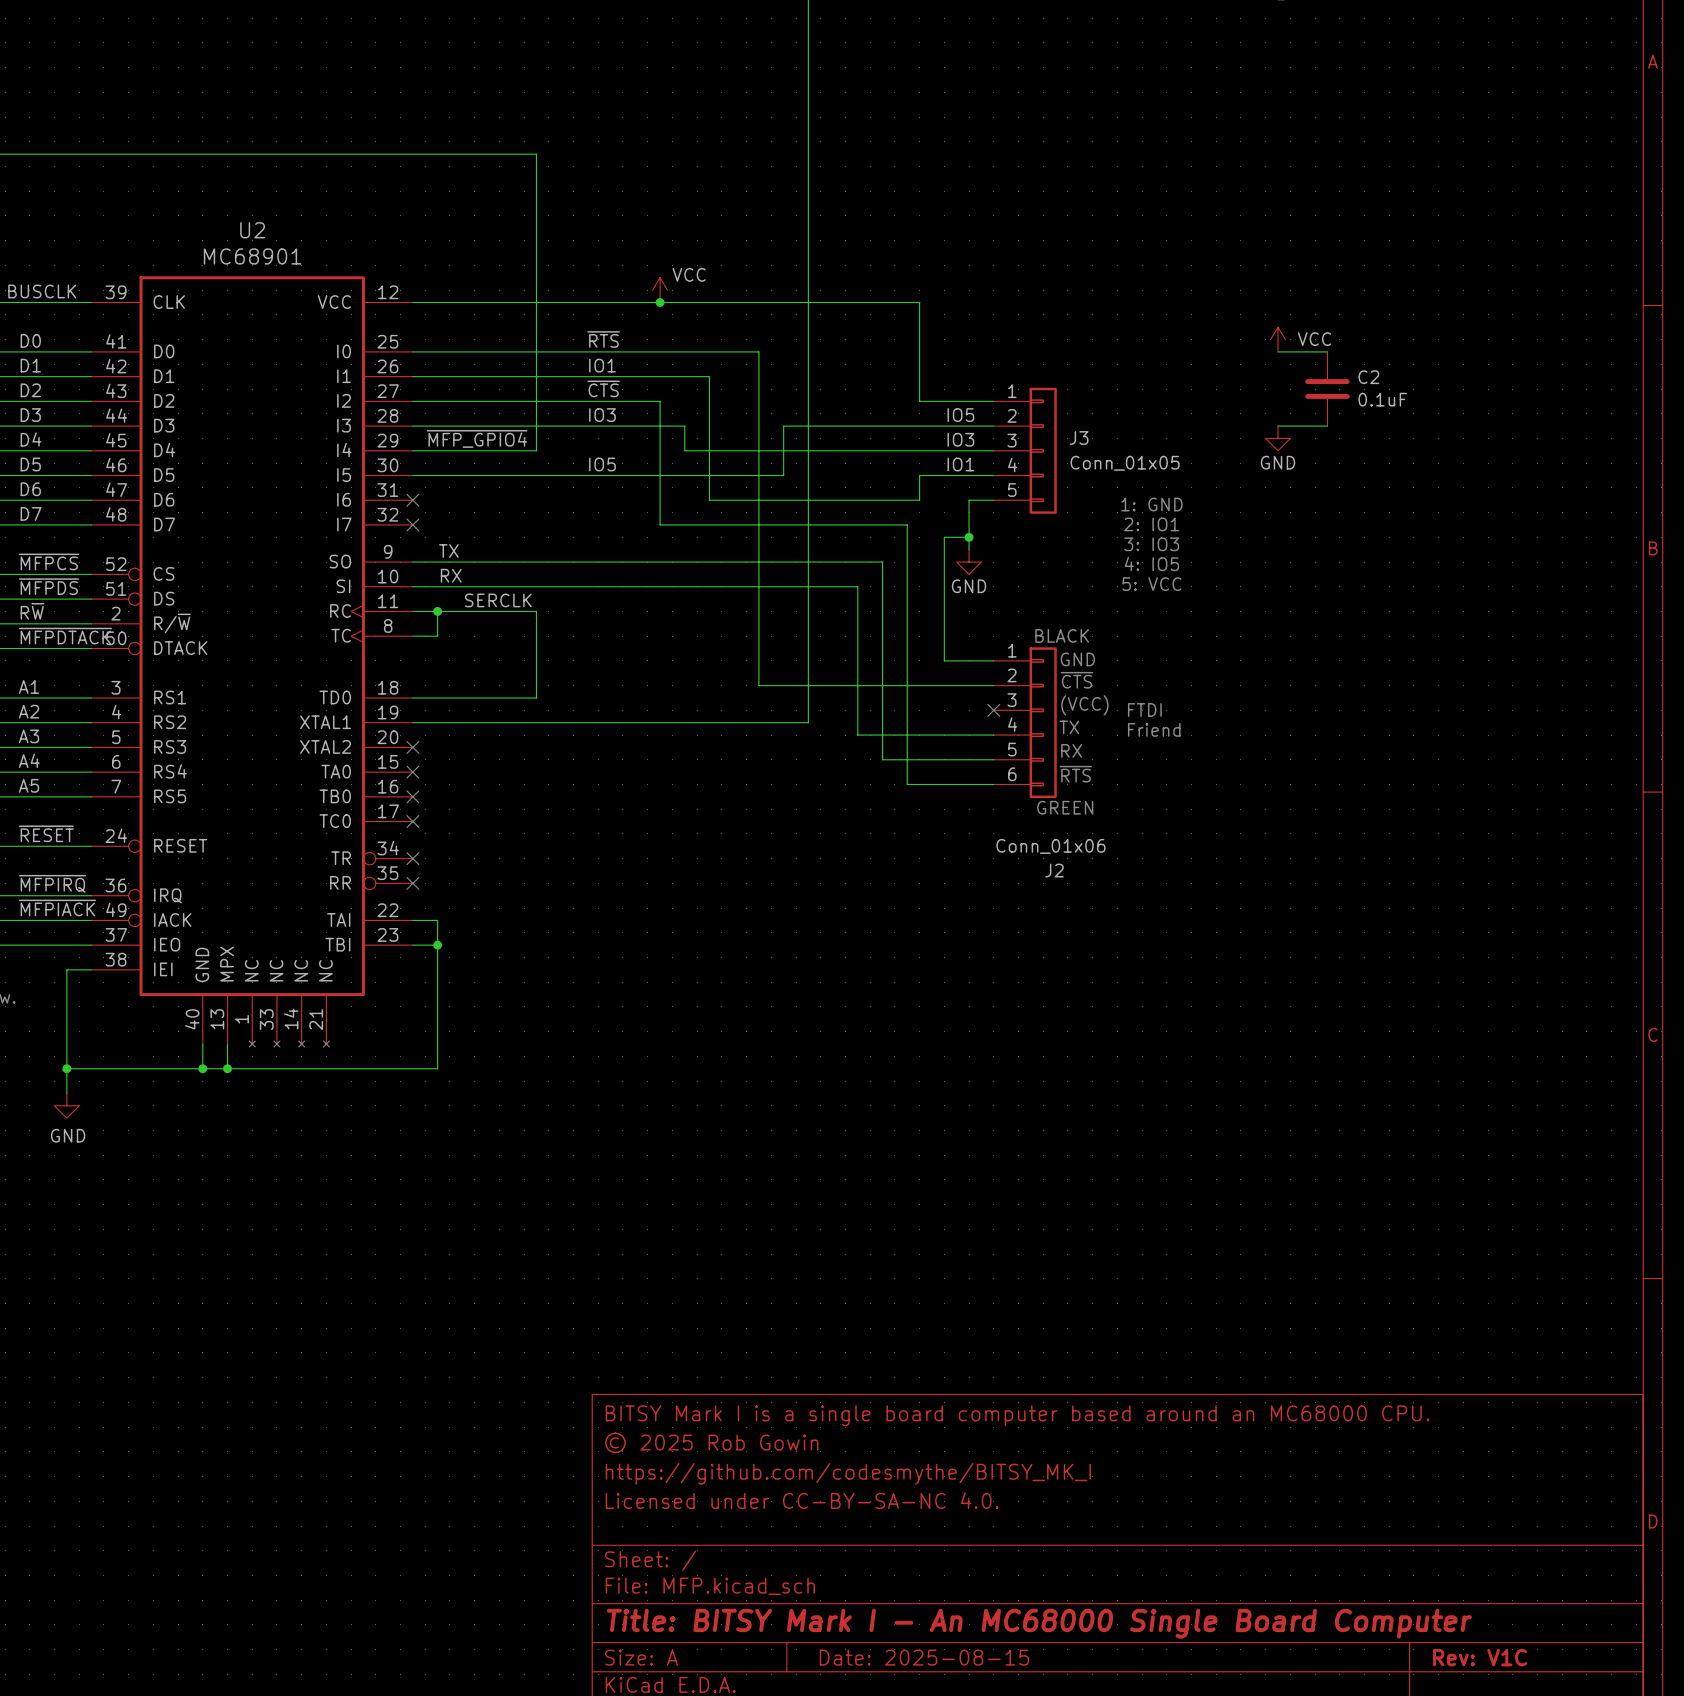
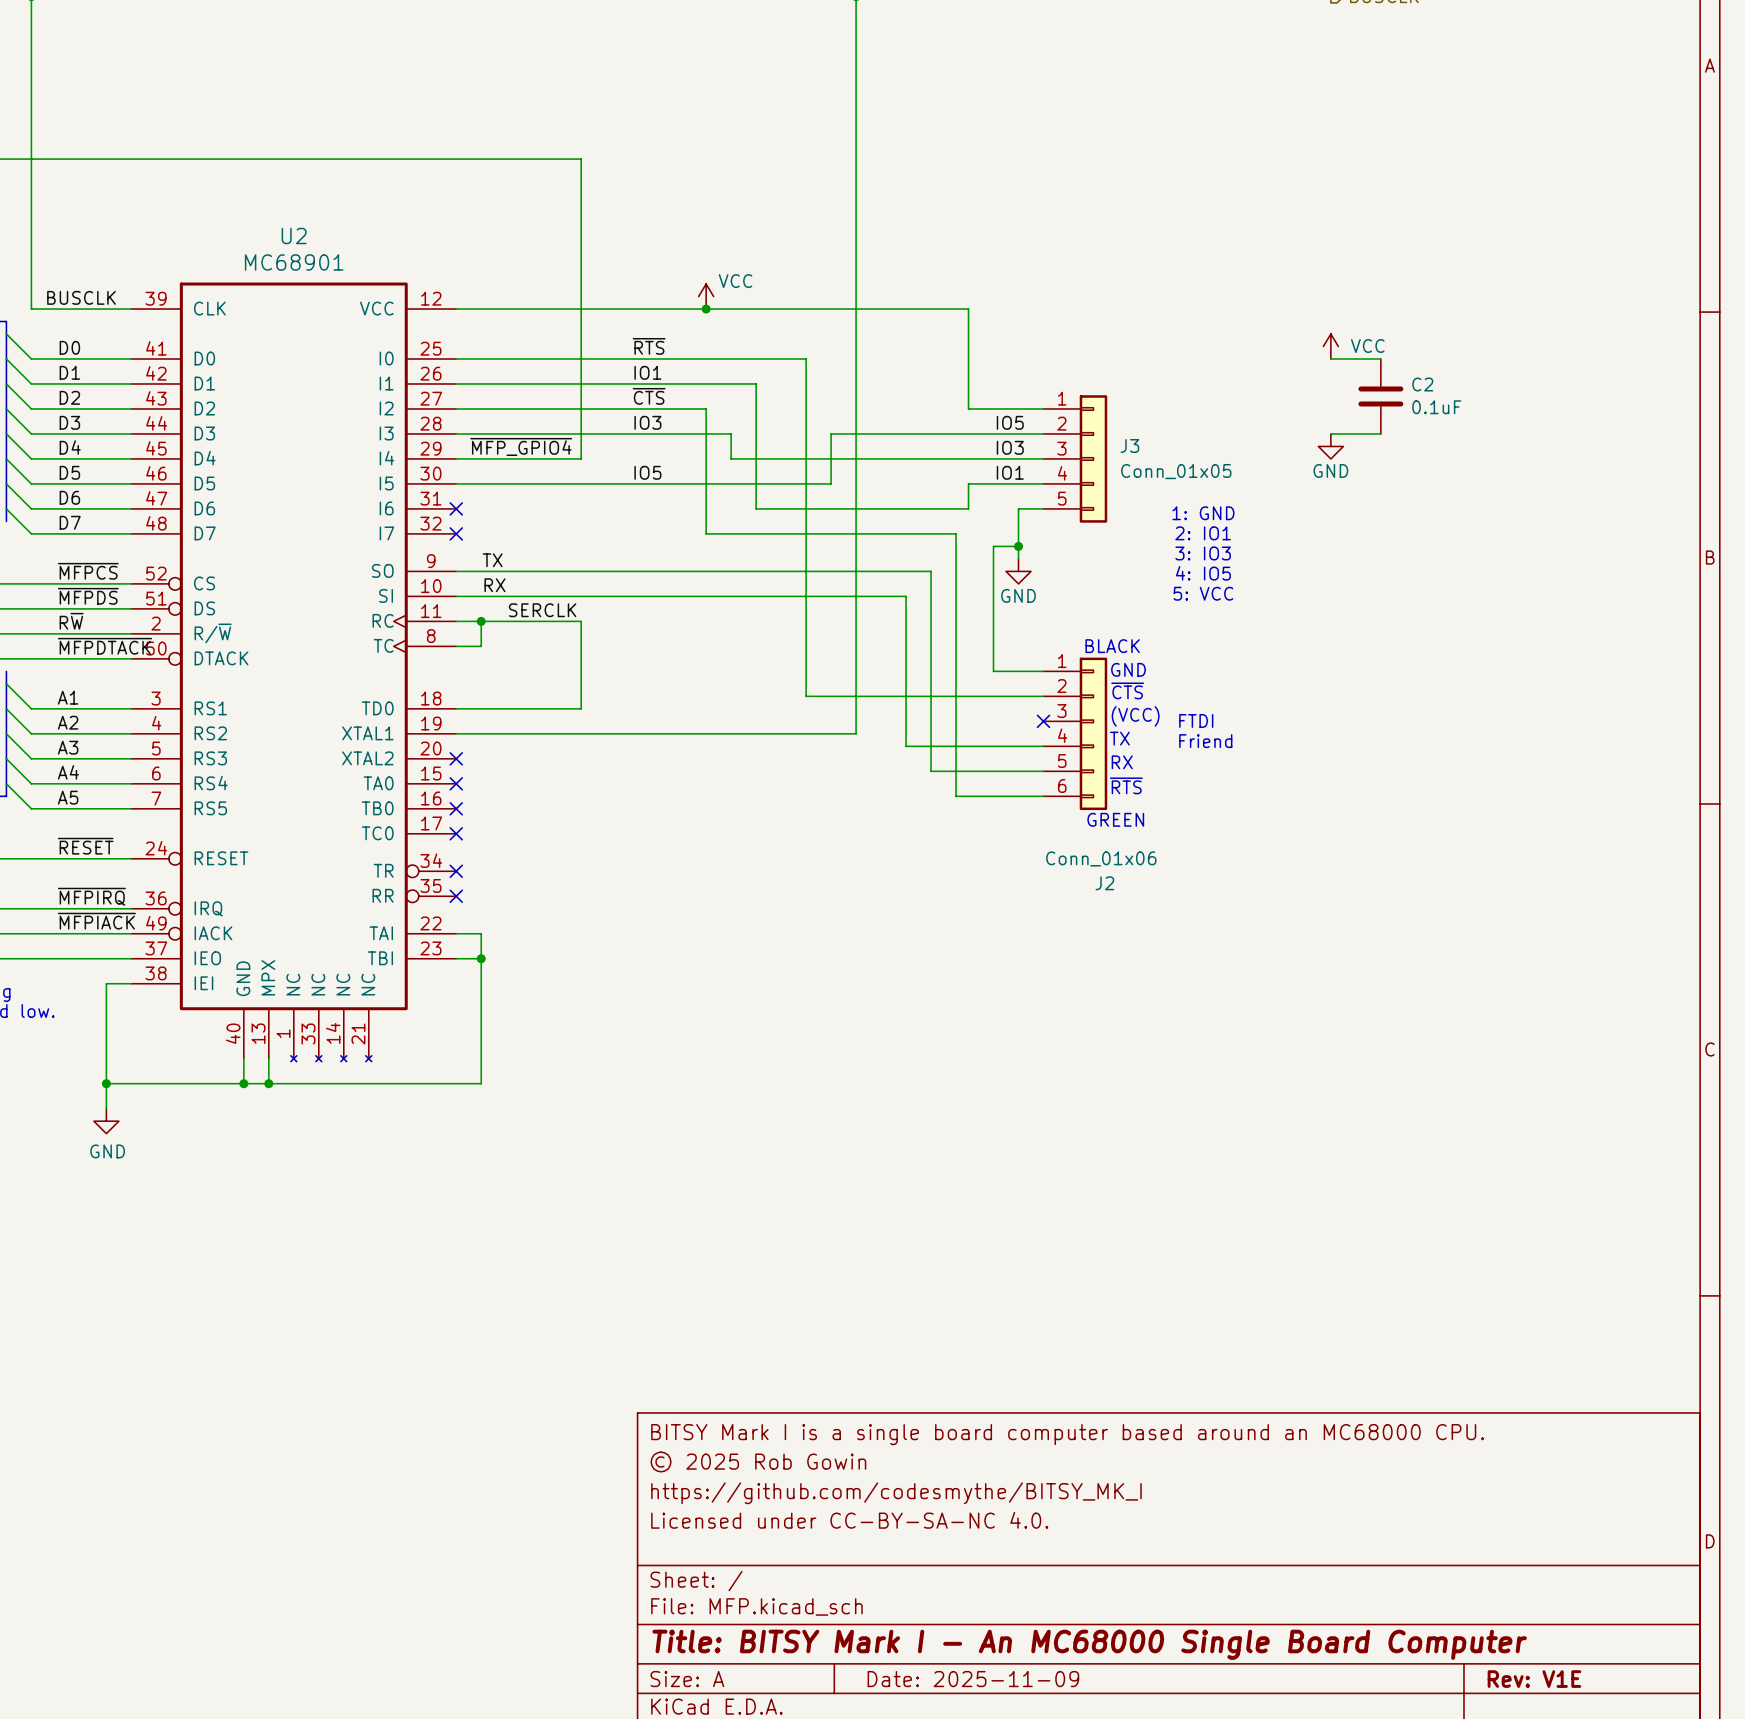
title block: Date: 2025-08-15 (924, 1657) -> Date: 2025-11-09 (973, 1679)
title block: Rev: V1C (1480, 1657) -> Rev: V1E (1534, 1679)

